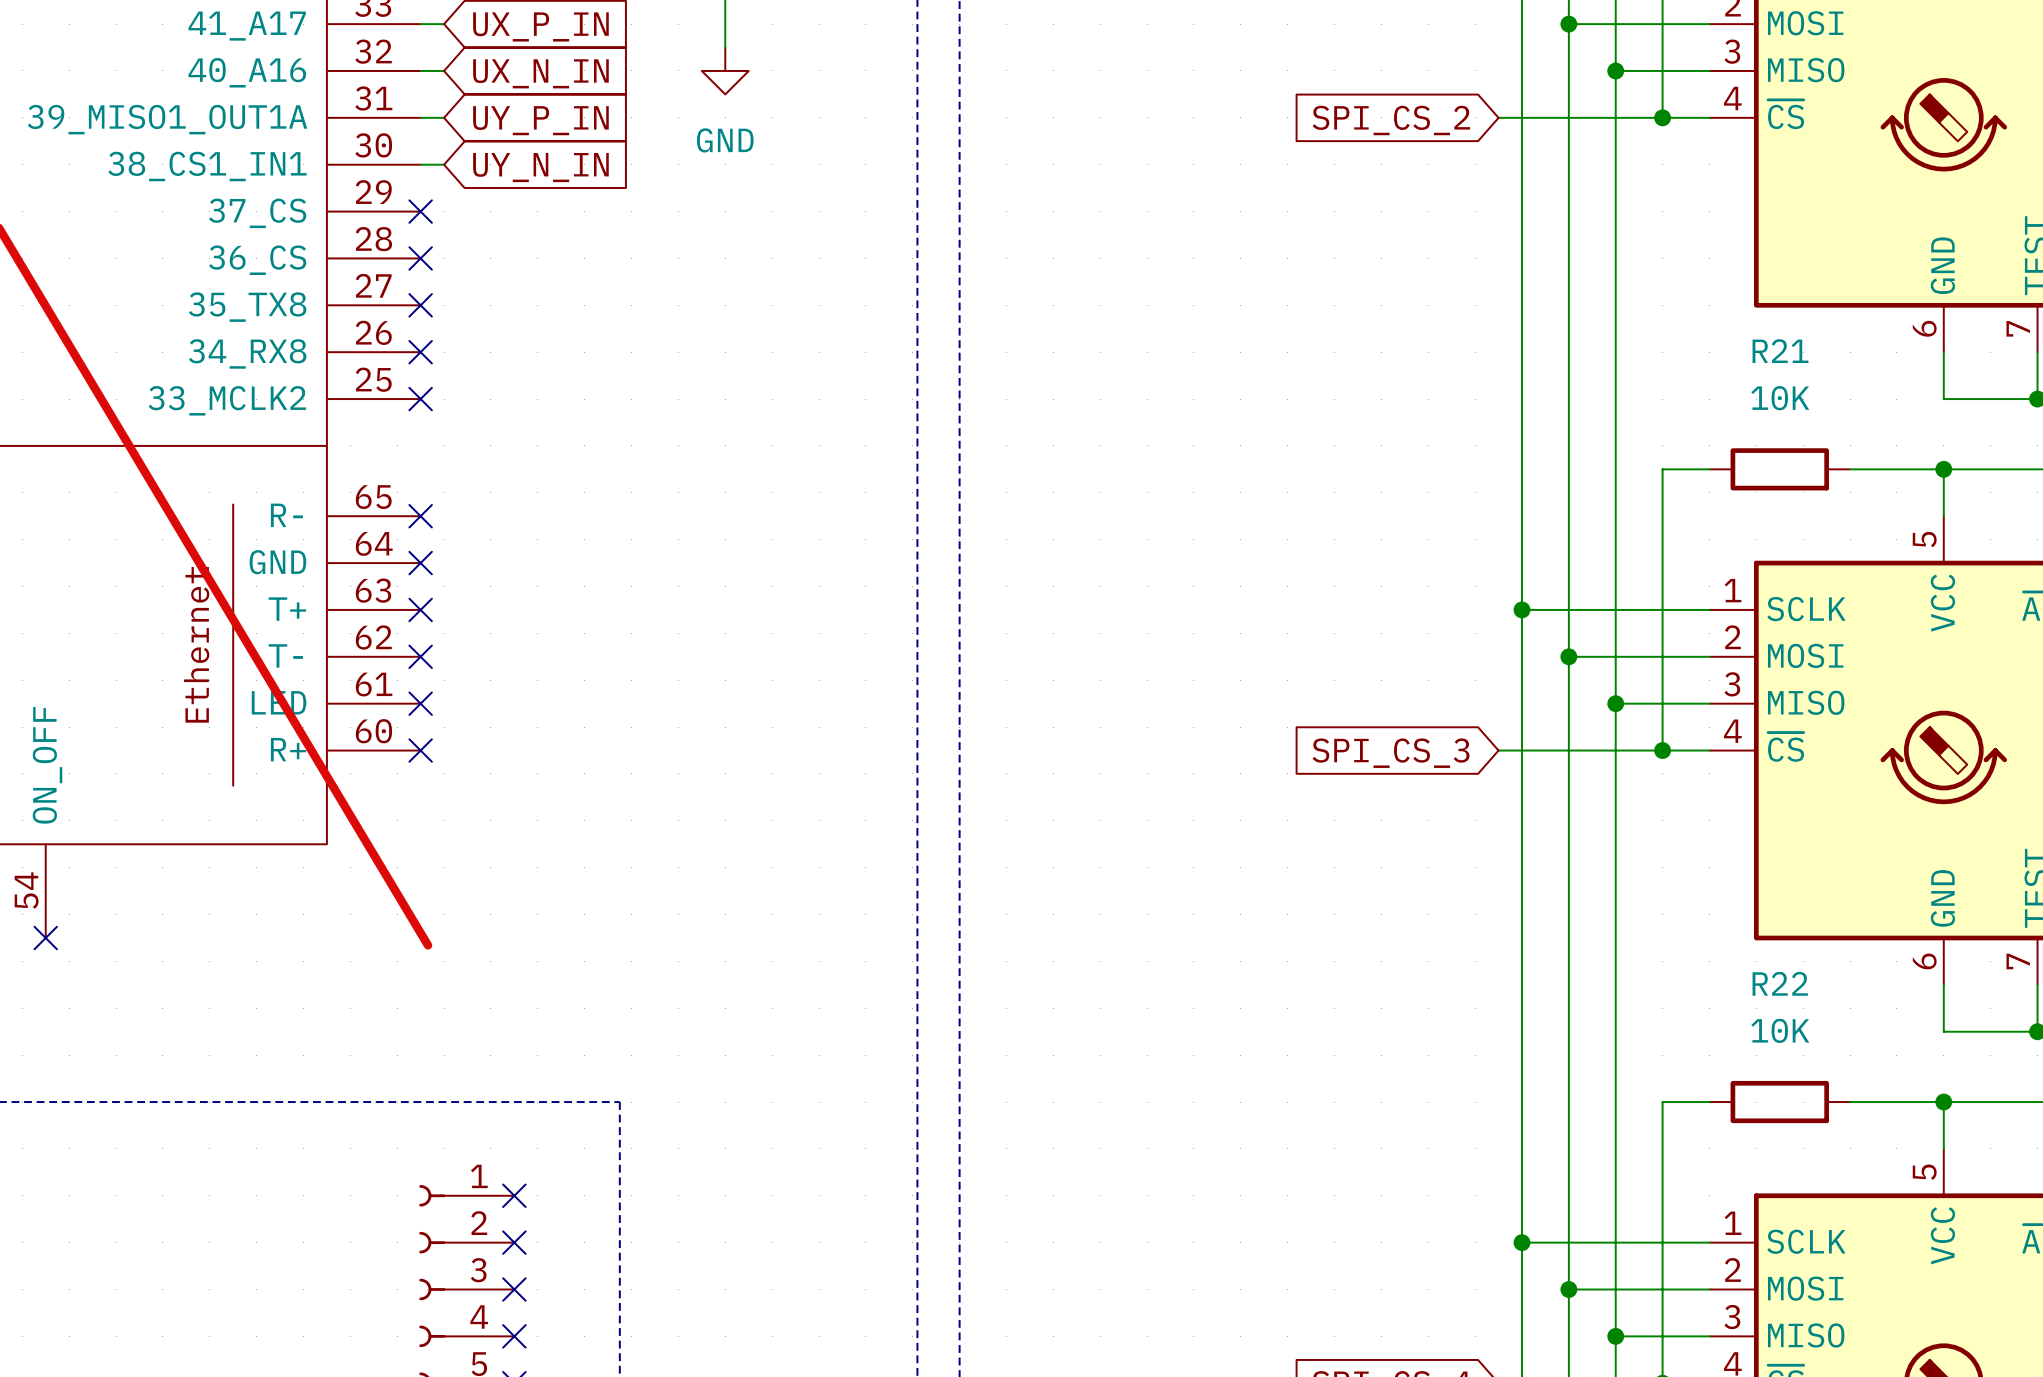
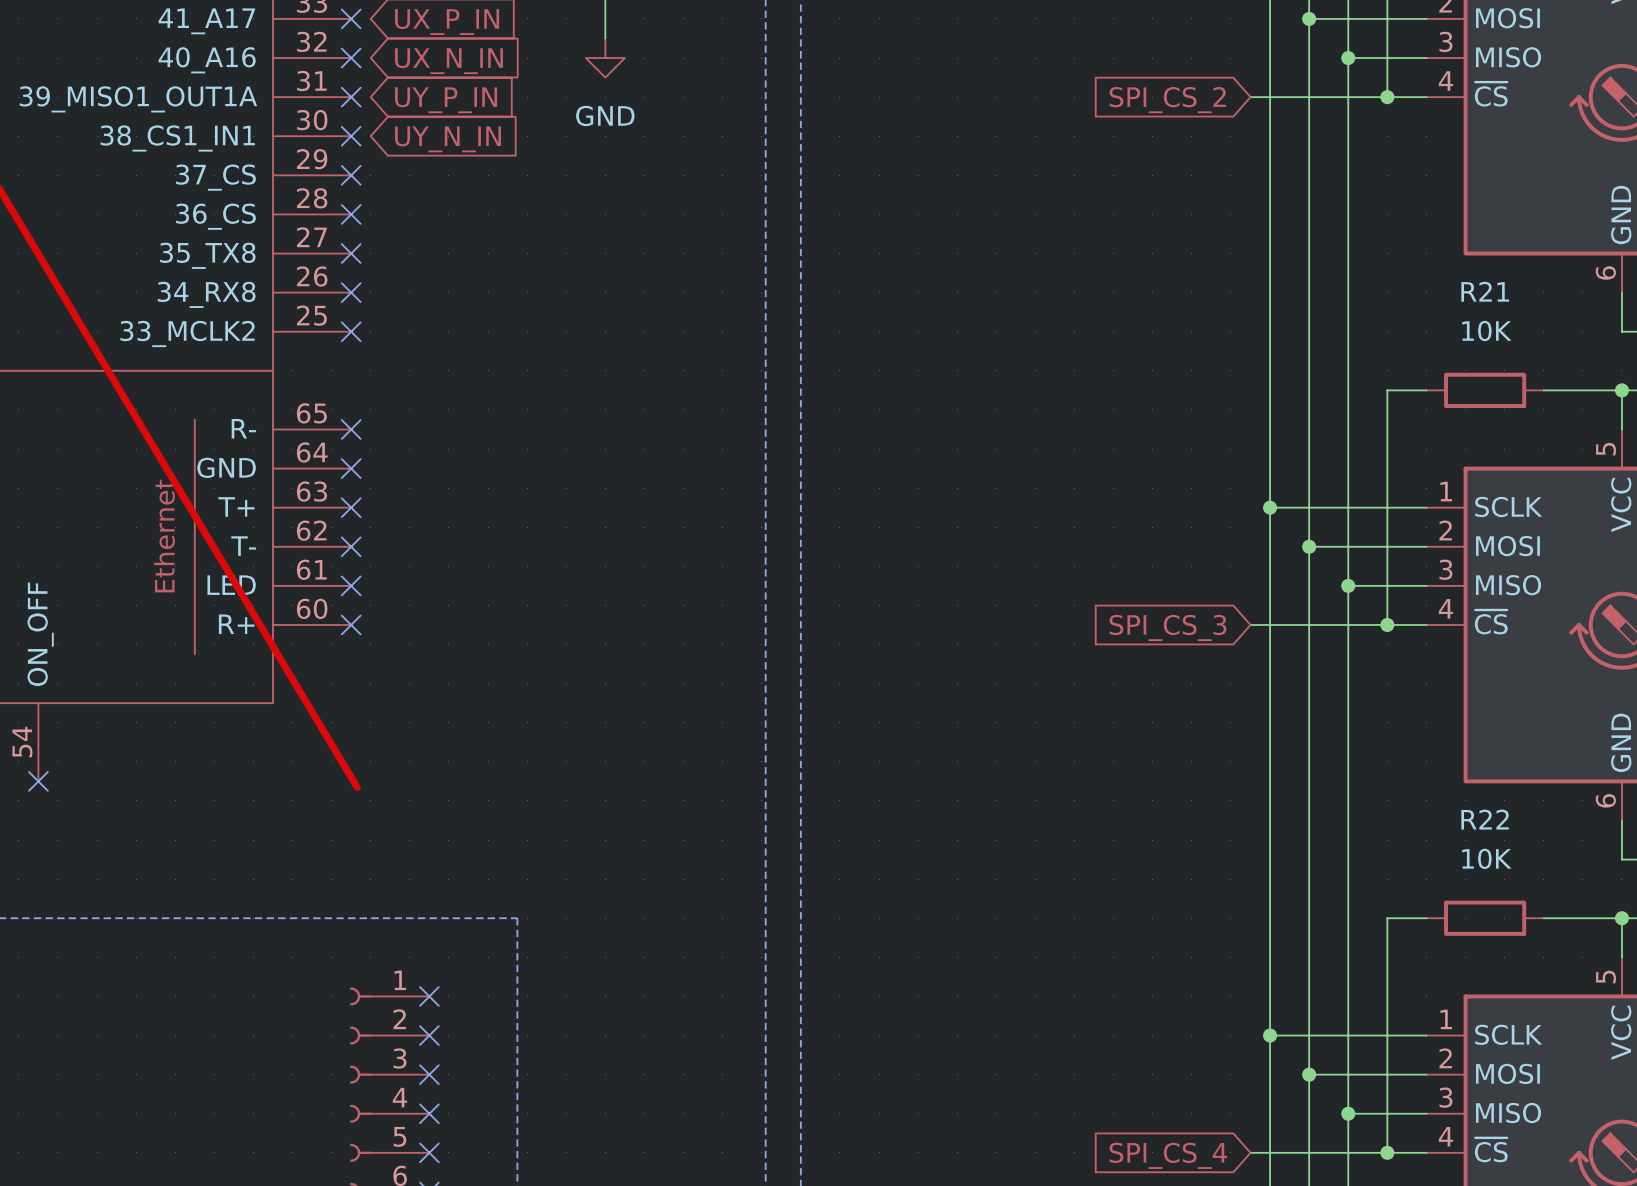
wire: (420, 24) (444, 24) -> none
no-connect mark: none -> (351, 18)
wire: (420, 70) (444, 70) -> none
no-connect mark: none -> (351, 58)
wire: (420, 117) (444, 117) -> none
no-connect mark: none -> (351, 97)
wire: (420, 164) (444, 164) -> none
no-connect mark: none -> (351, 136)

